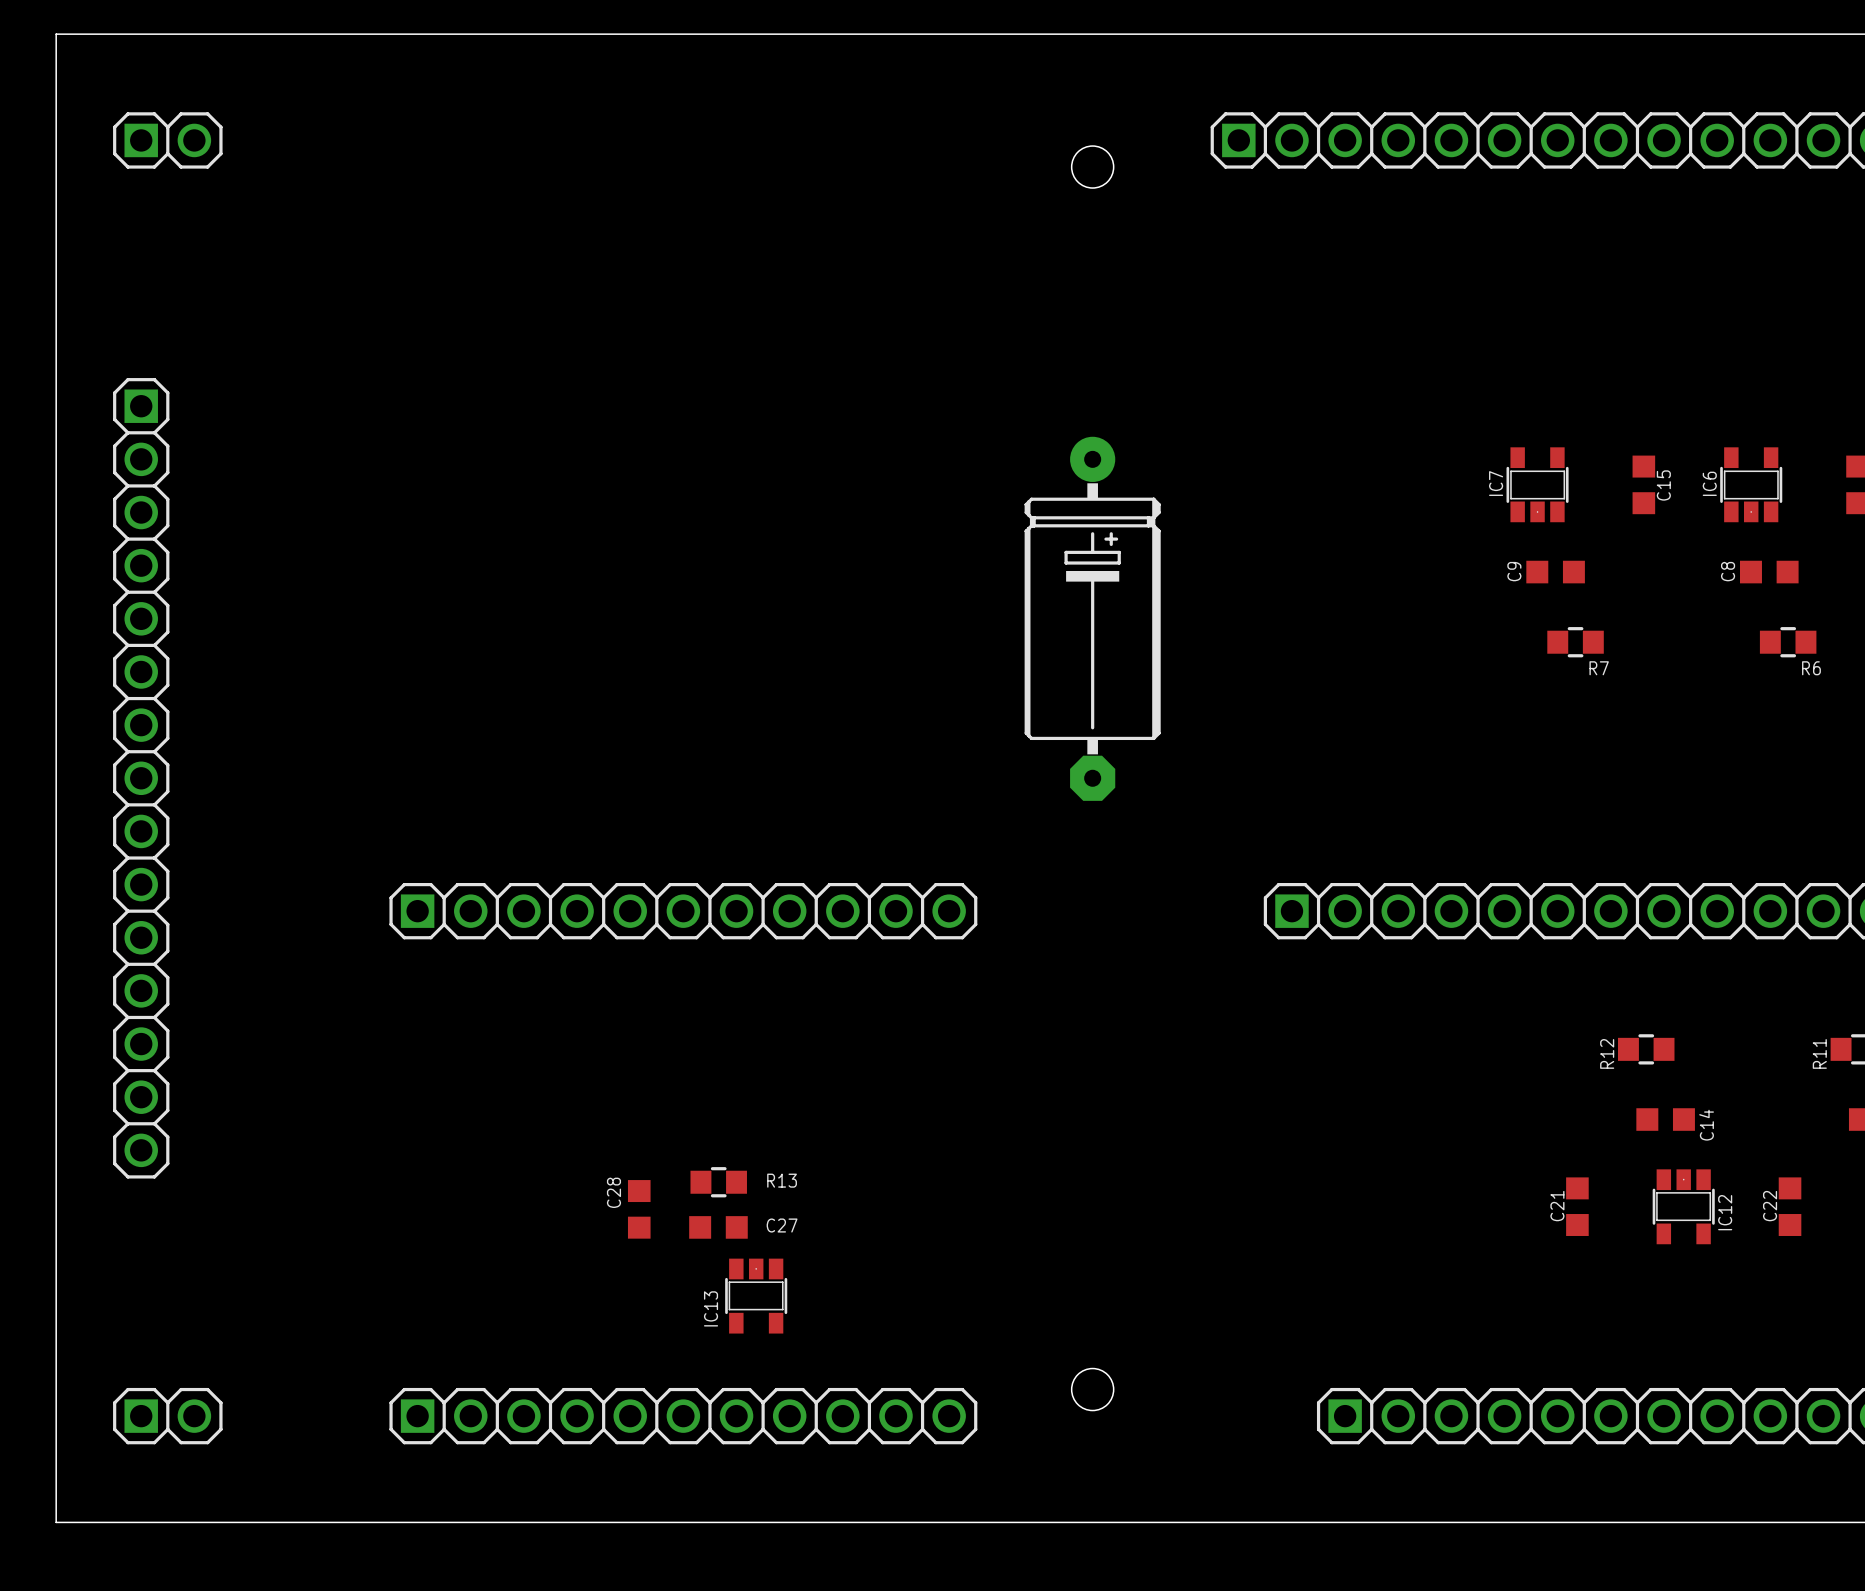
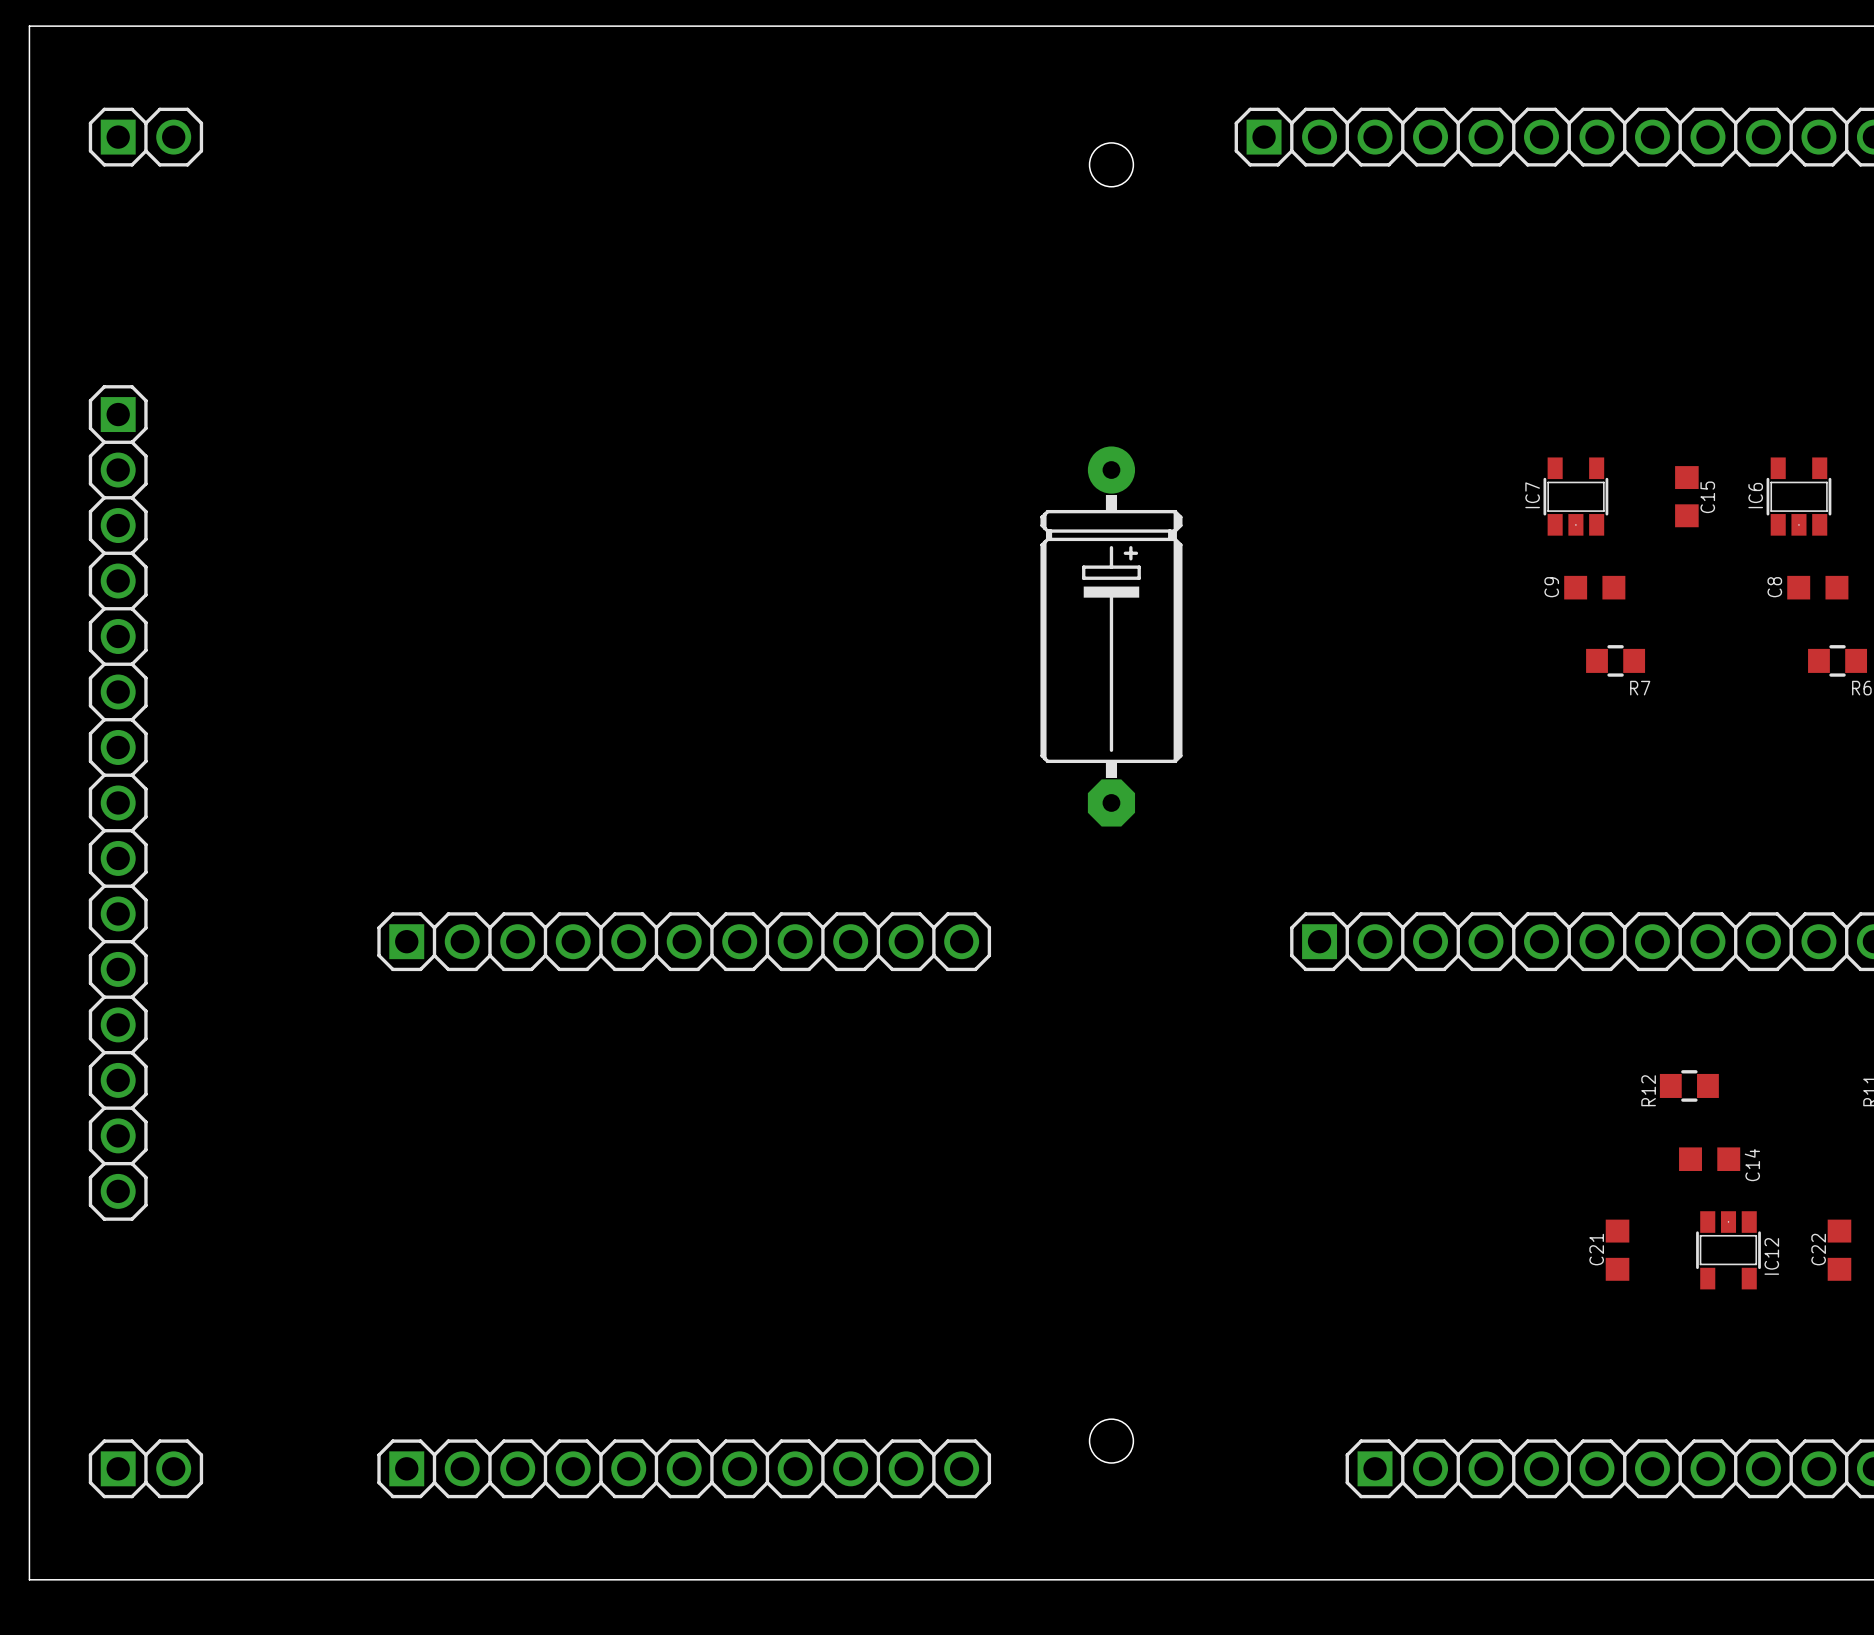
R13: (718, 1182) -> none
C28: (639, 1209) -> none
C27: (718, 1227) -> none
IC13: (756, 1296) -> none

